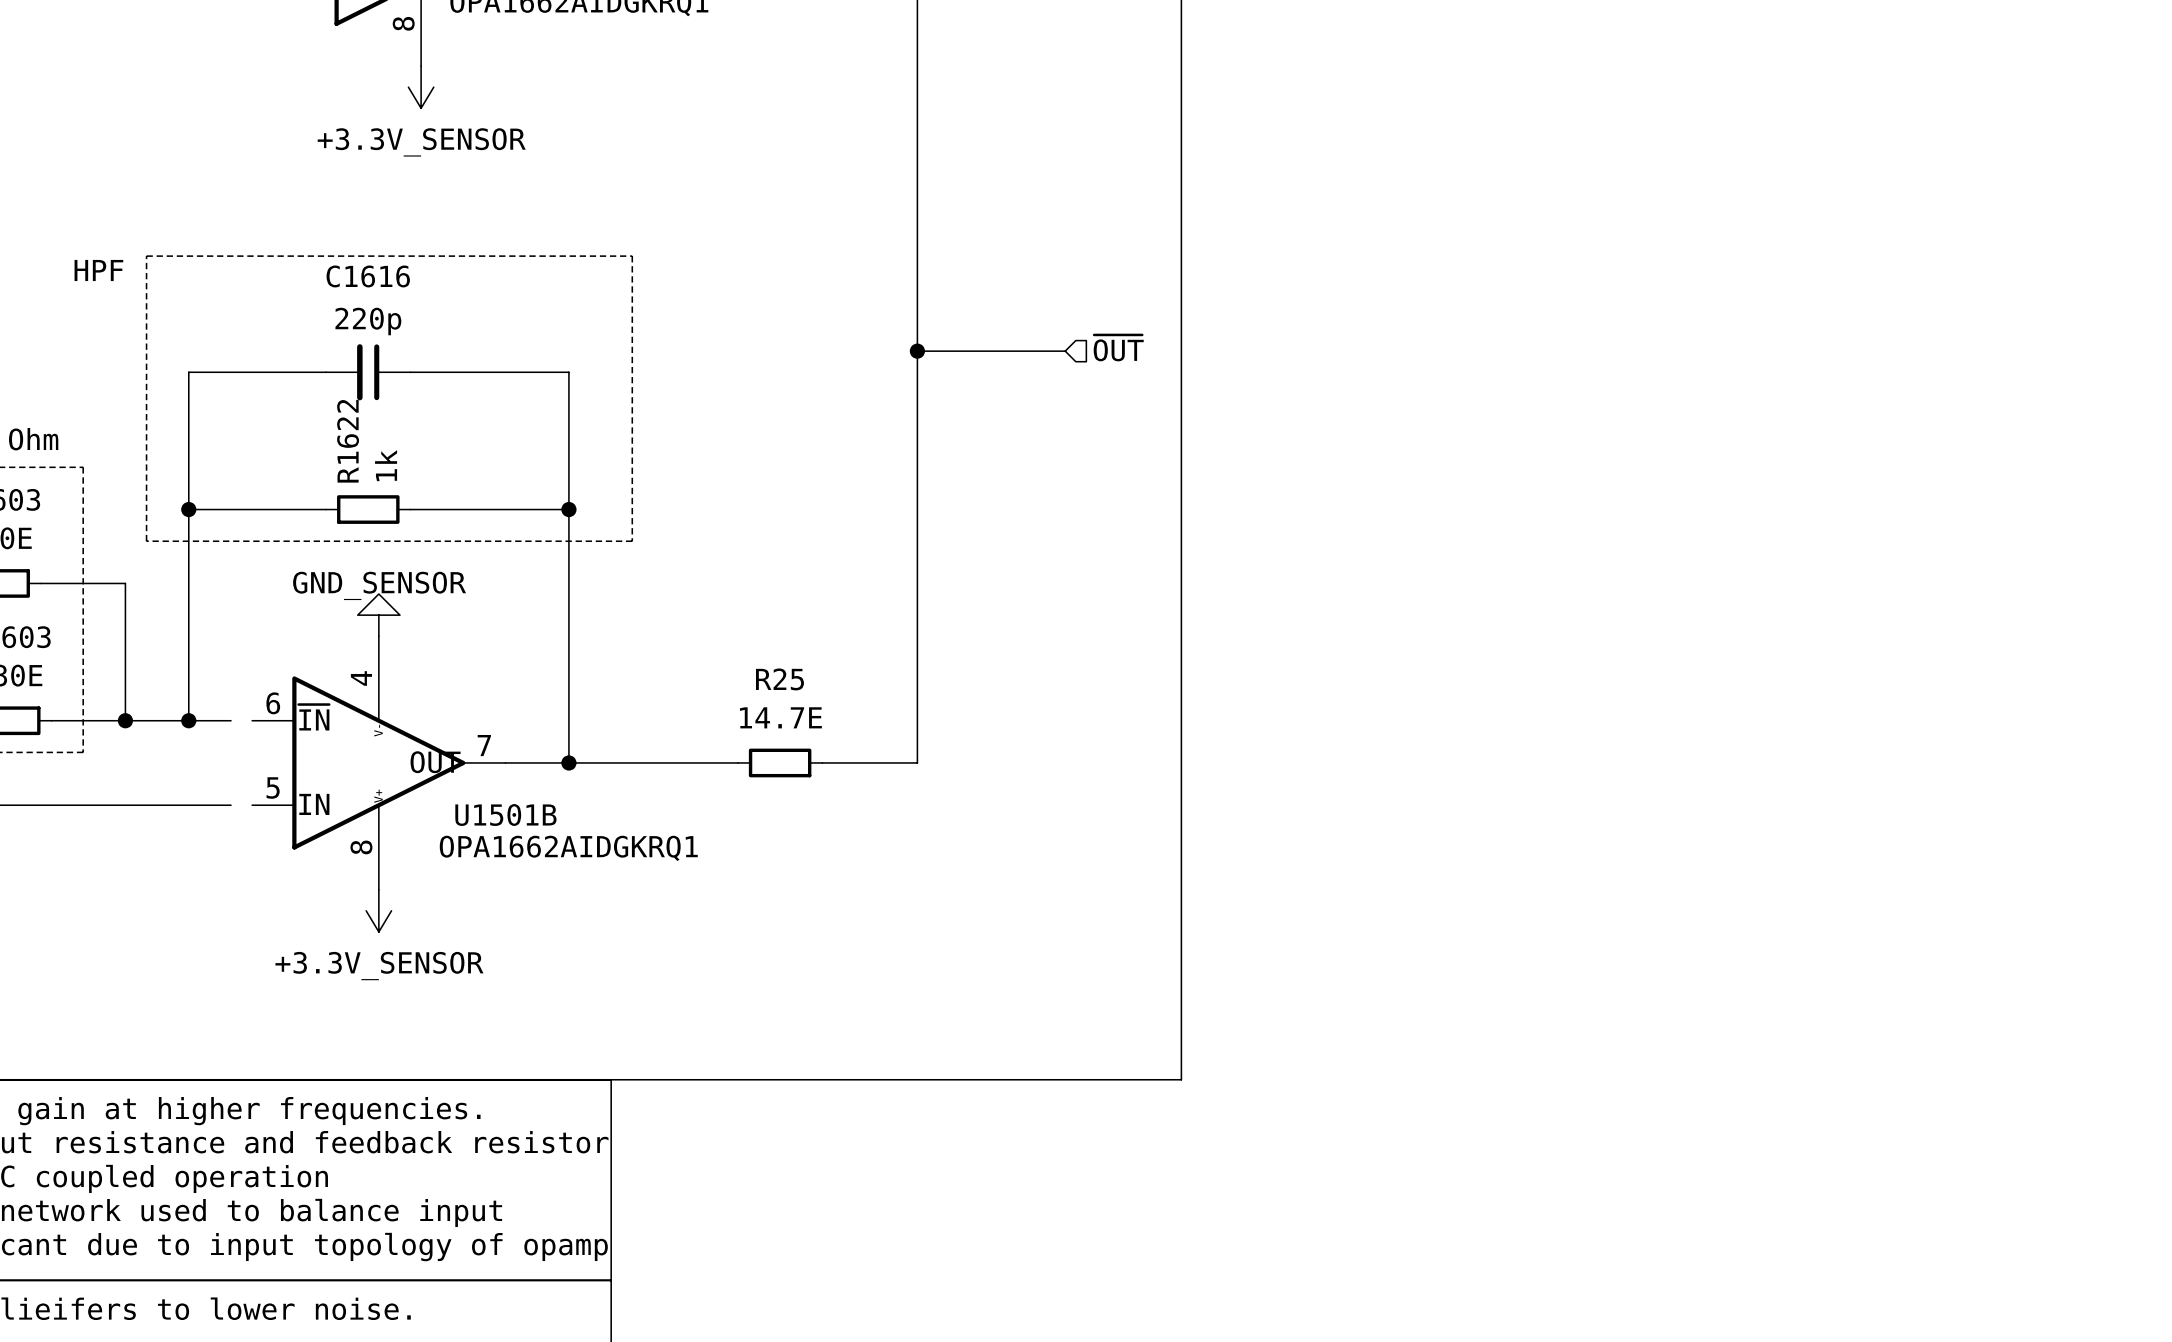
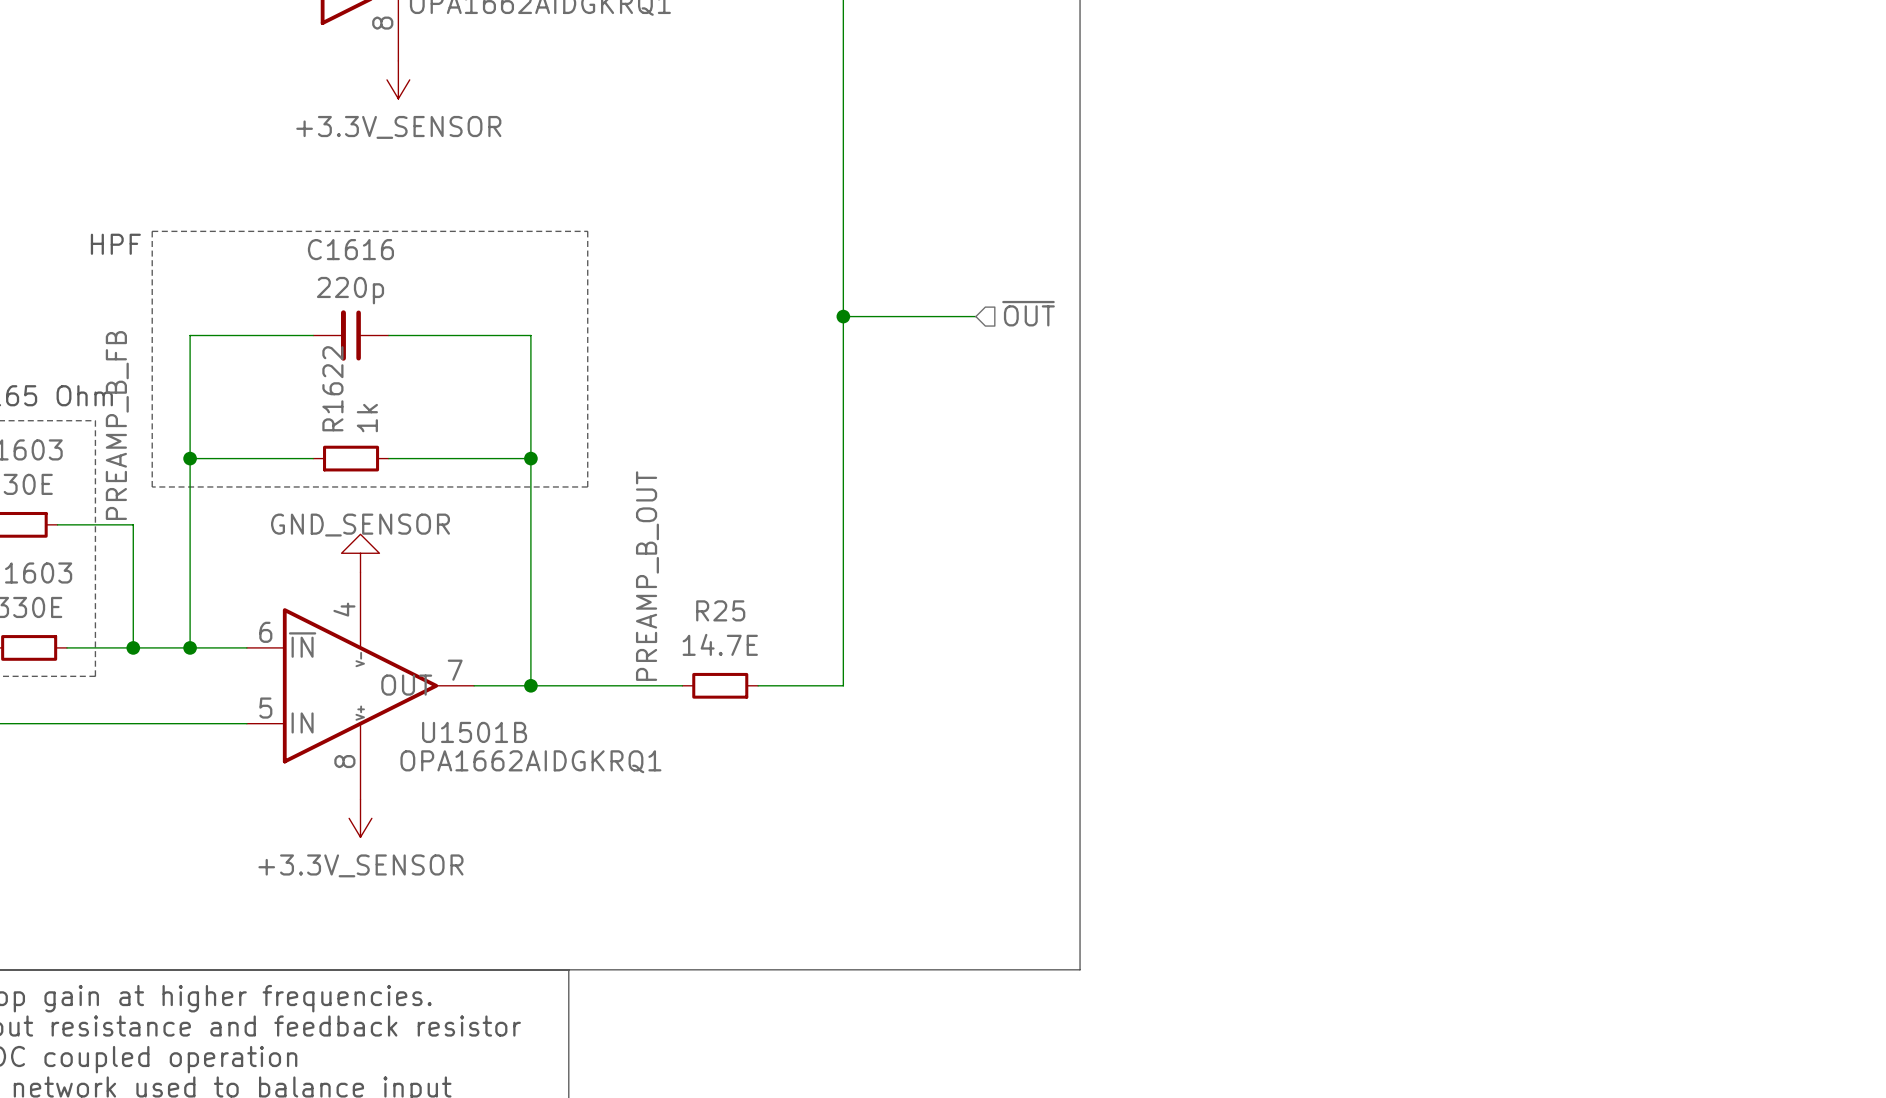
label: none -> PREAMP_B_FB (117, 425)
label: none -> PREAMP_B_OUT (647, 576)
wire: none -> (227, 647) (246, 647)
wire: none -> (227, 723) (246, 723)

